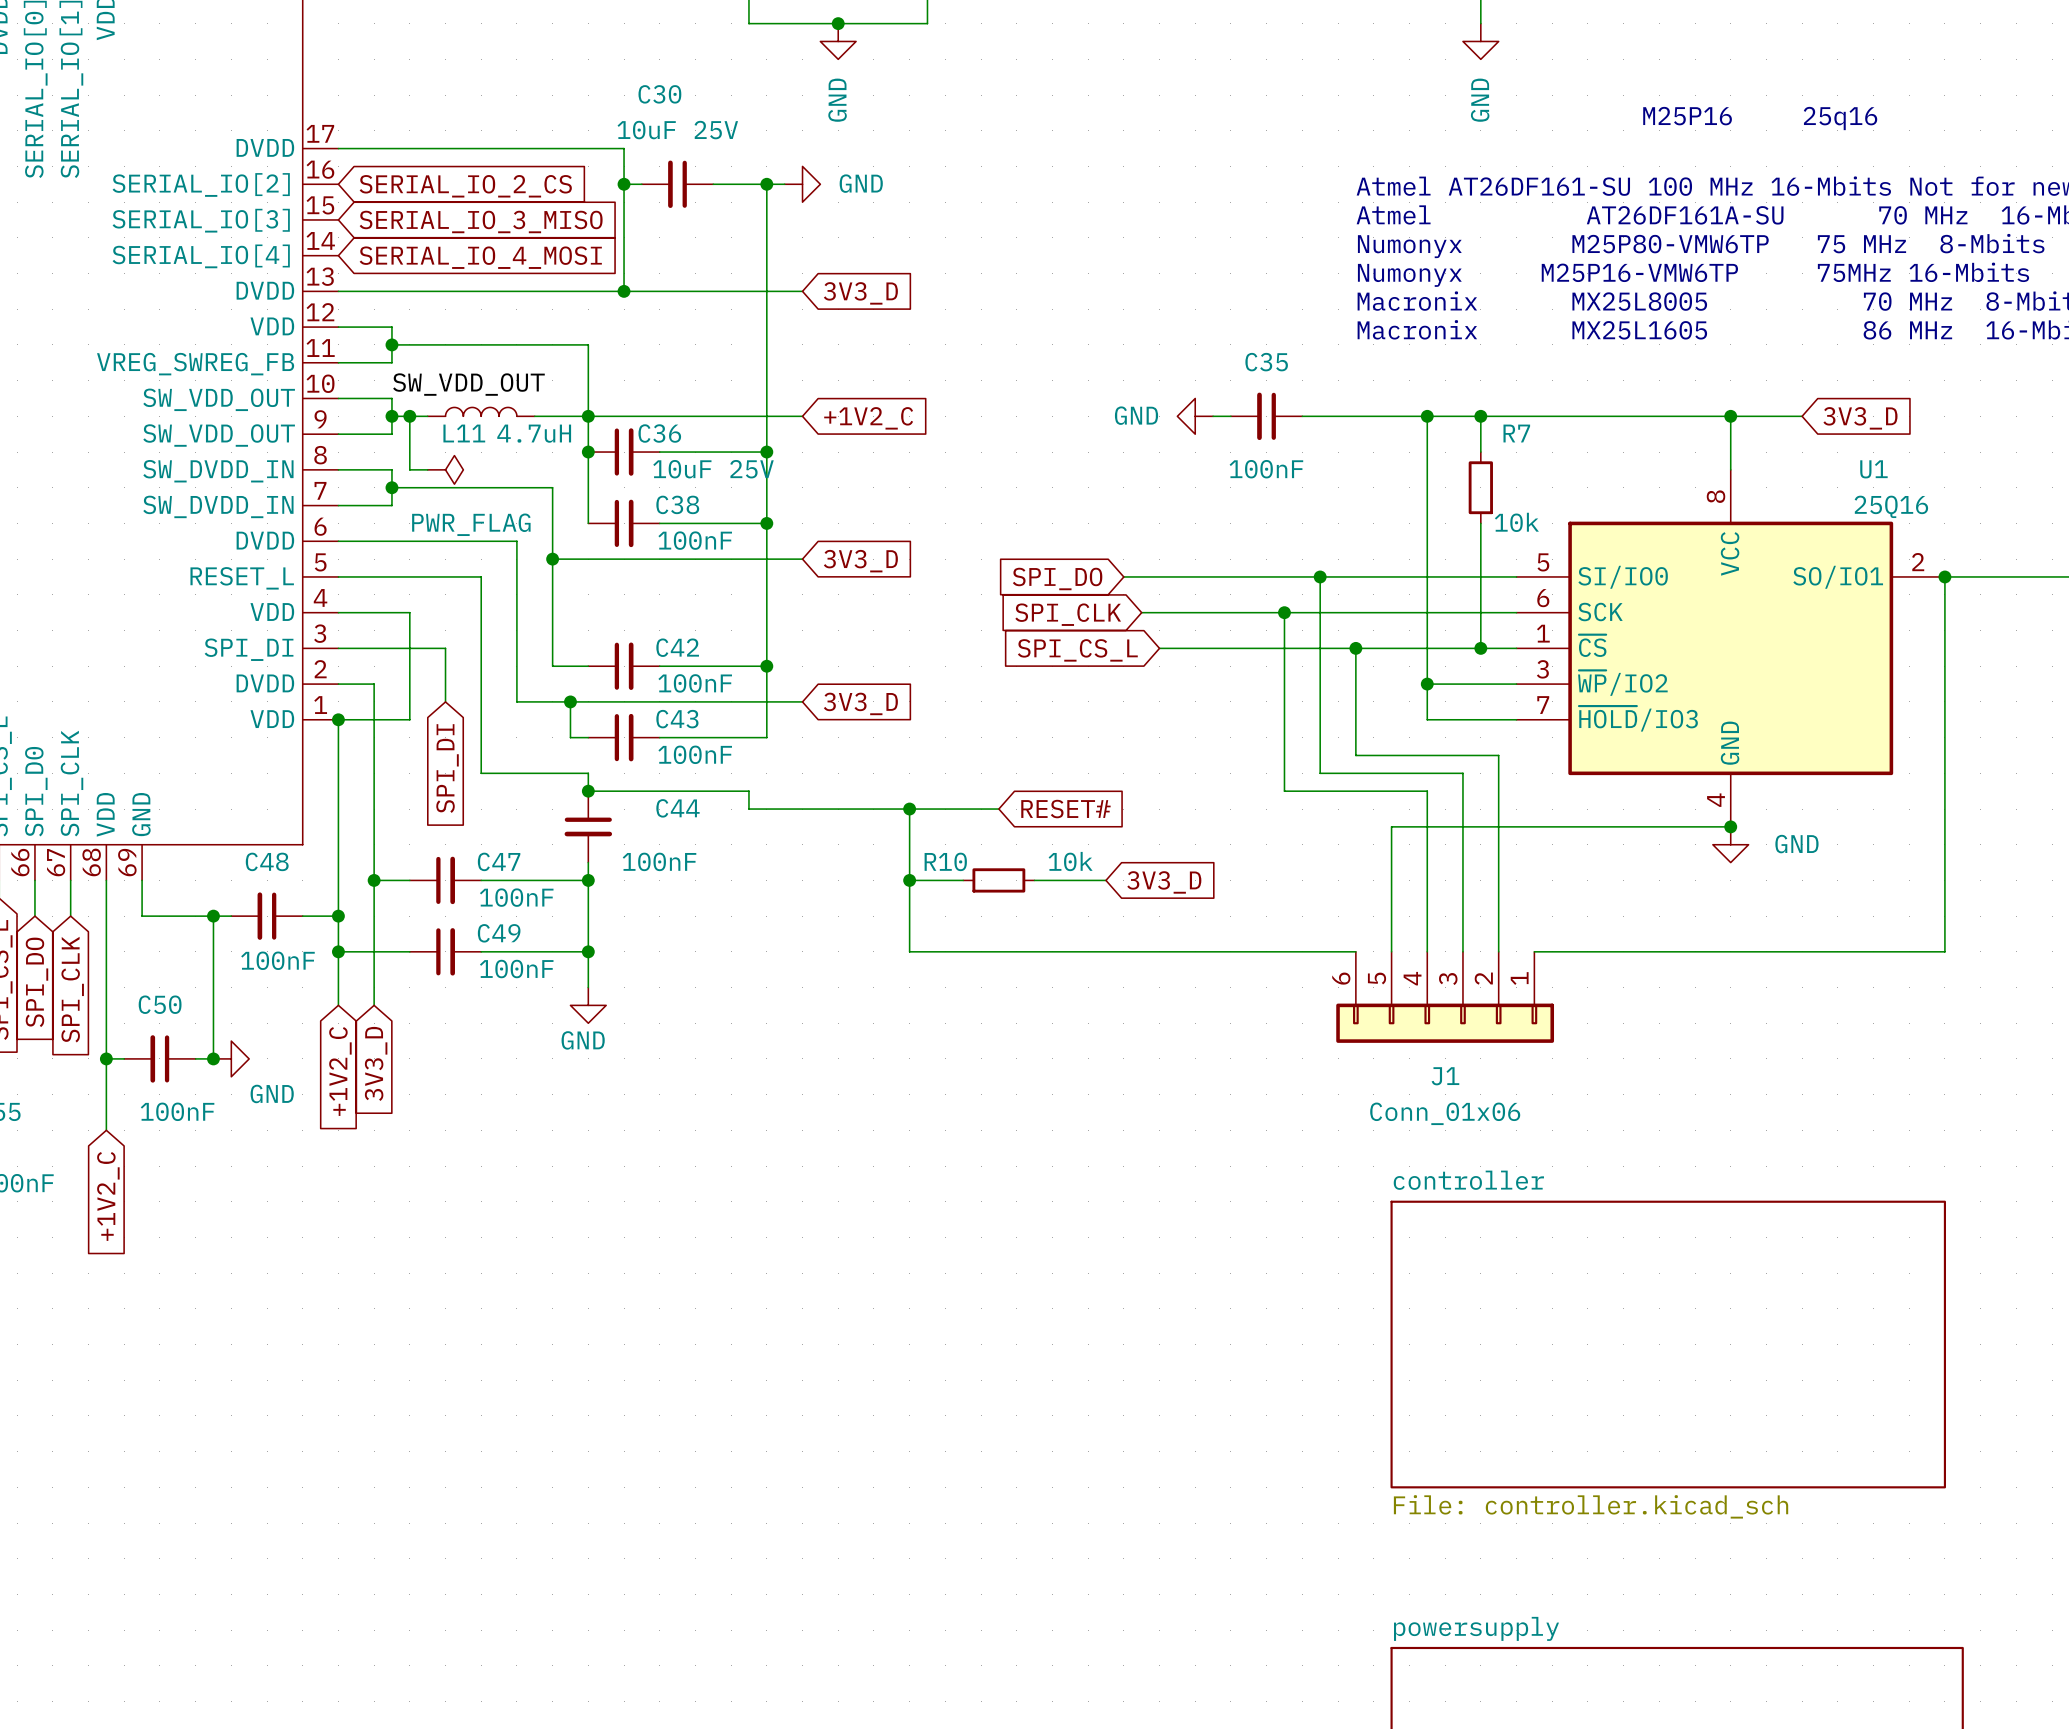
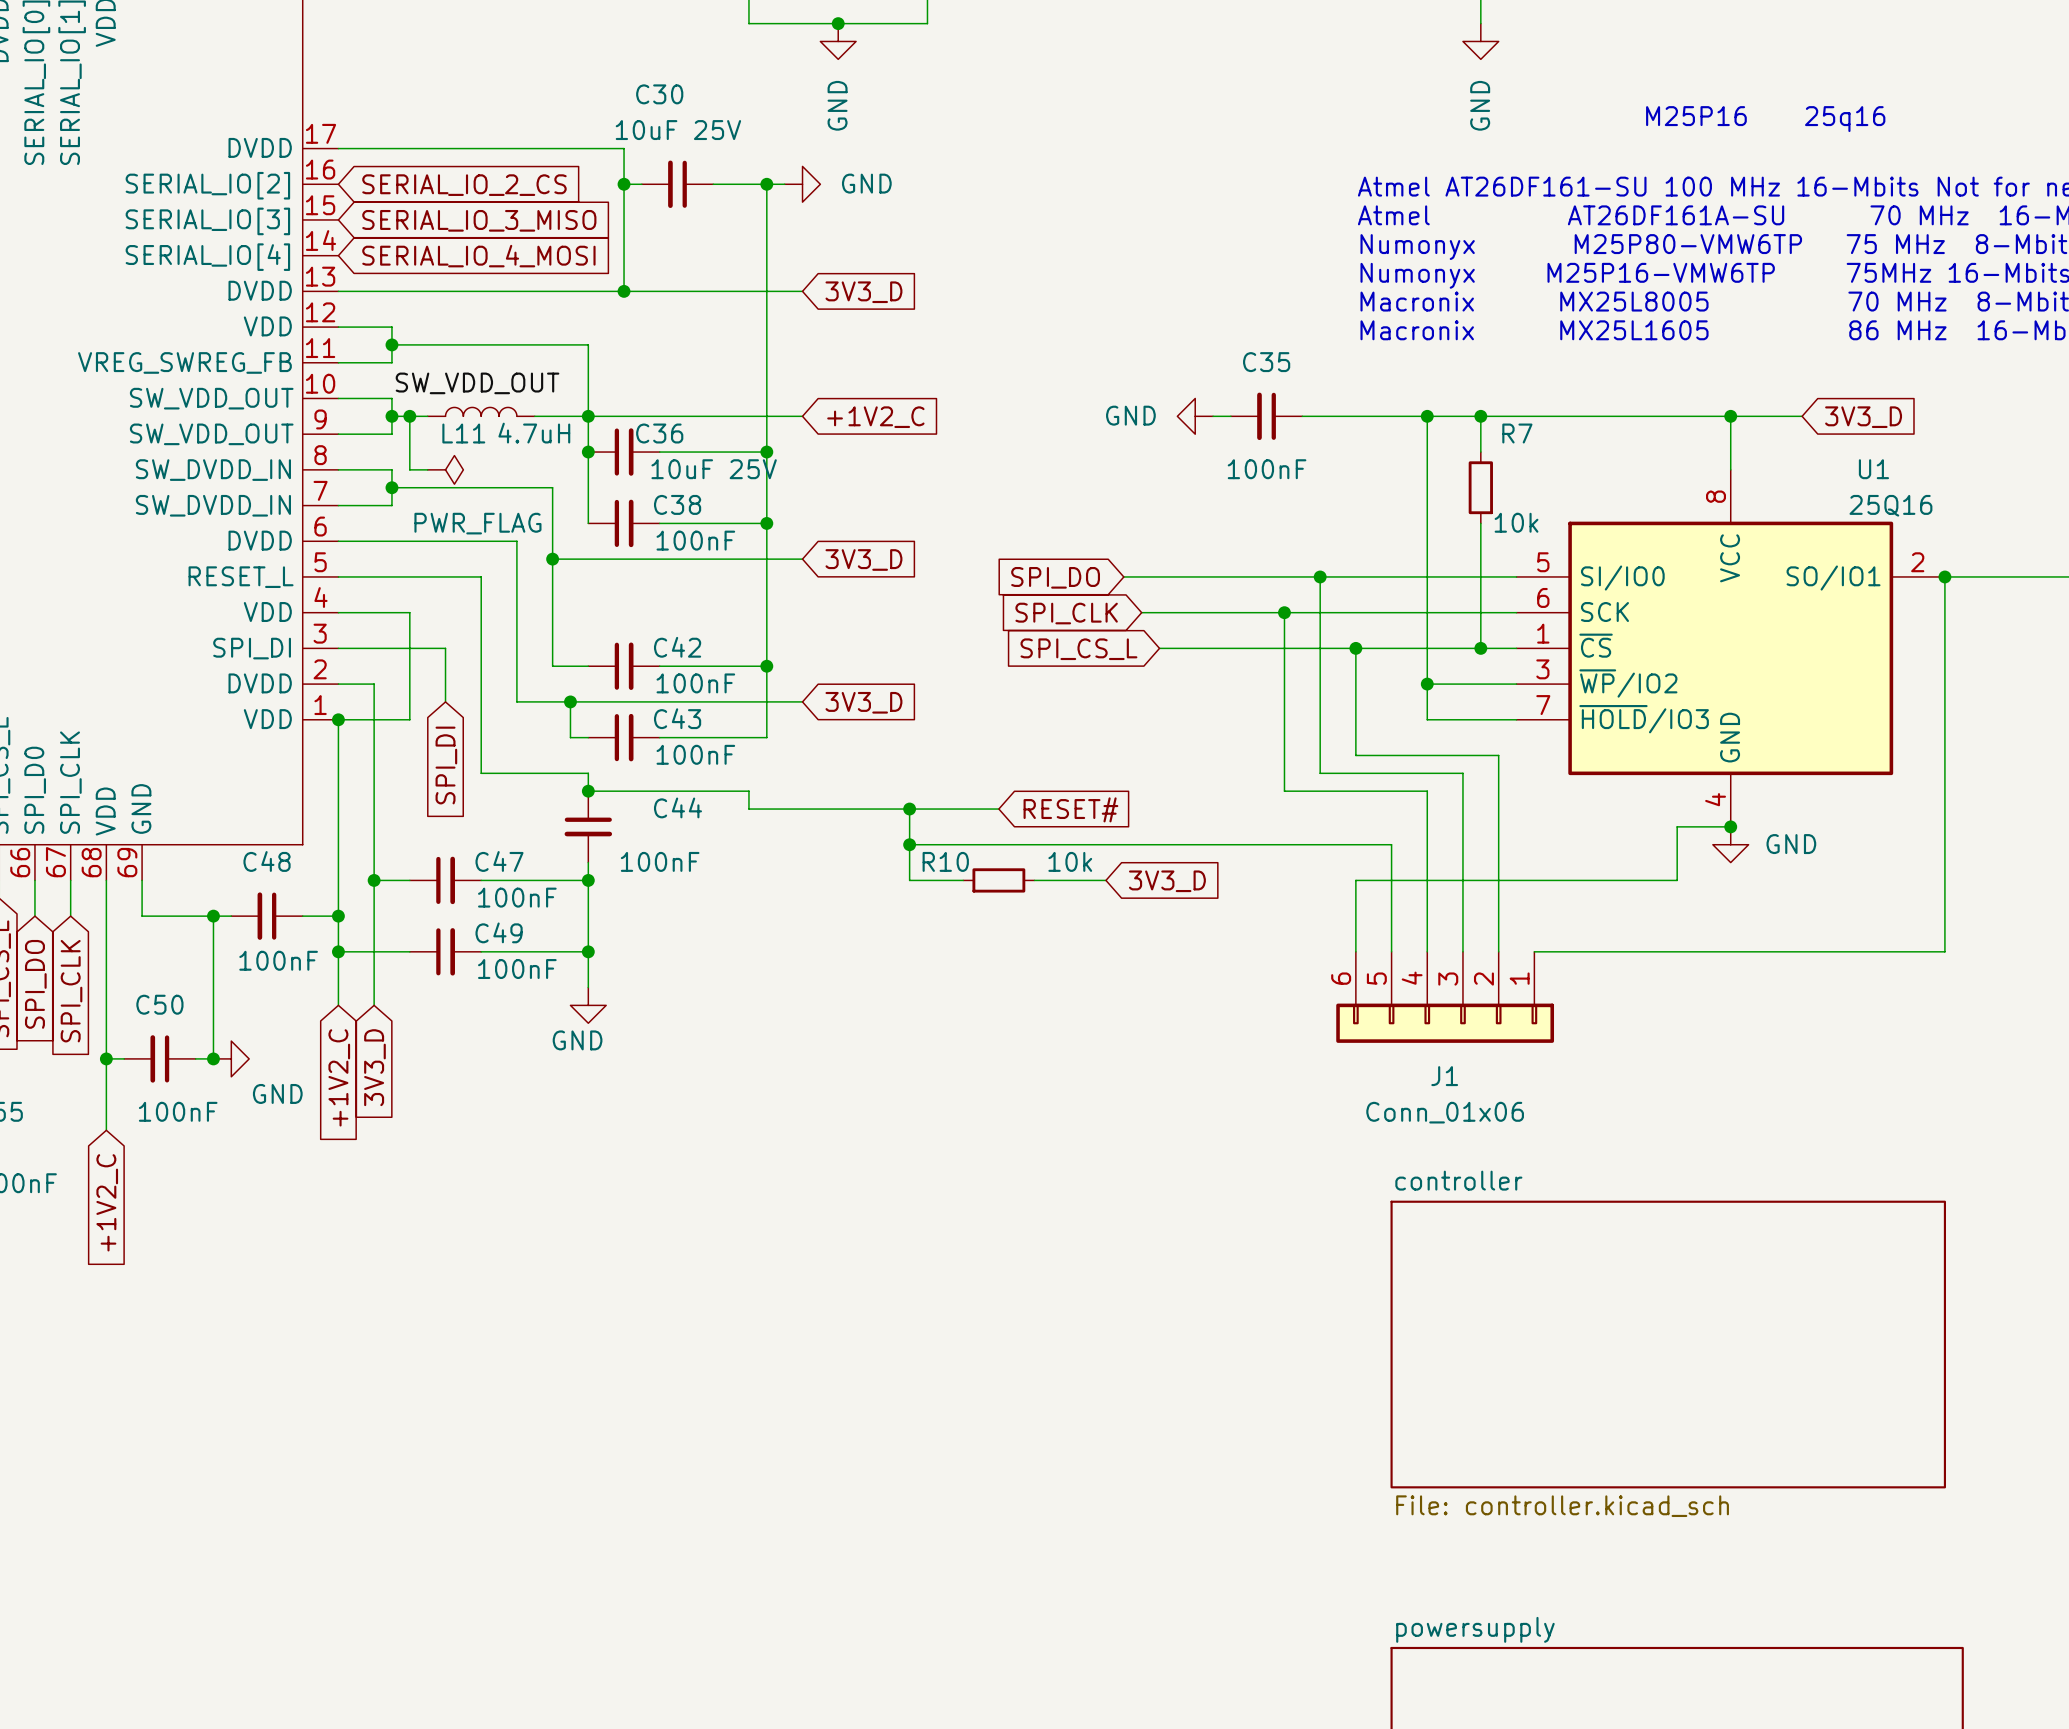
wire: (1677, 826) (1391, 826) (1391, 844) -> (1677, 826) (1677, 880) (1355, 880) (1355, 951)
wire: none -> (909, 844) (1391, 844)
wire: (909, 880) (909, 951) (1355, 951) -> none
junction position: (909, 880) -> (909, 844)

